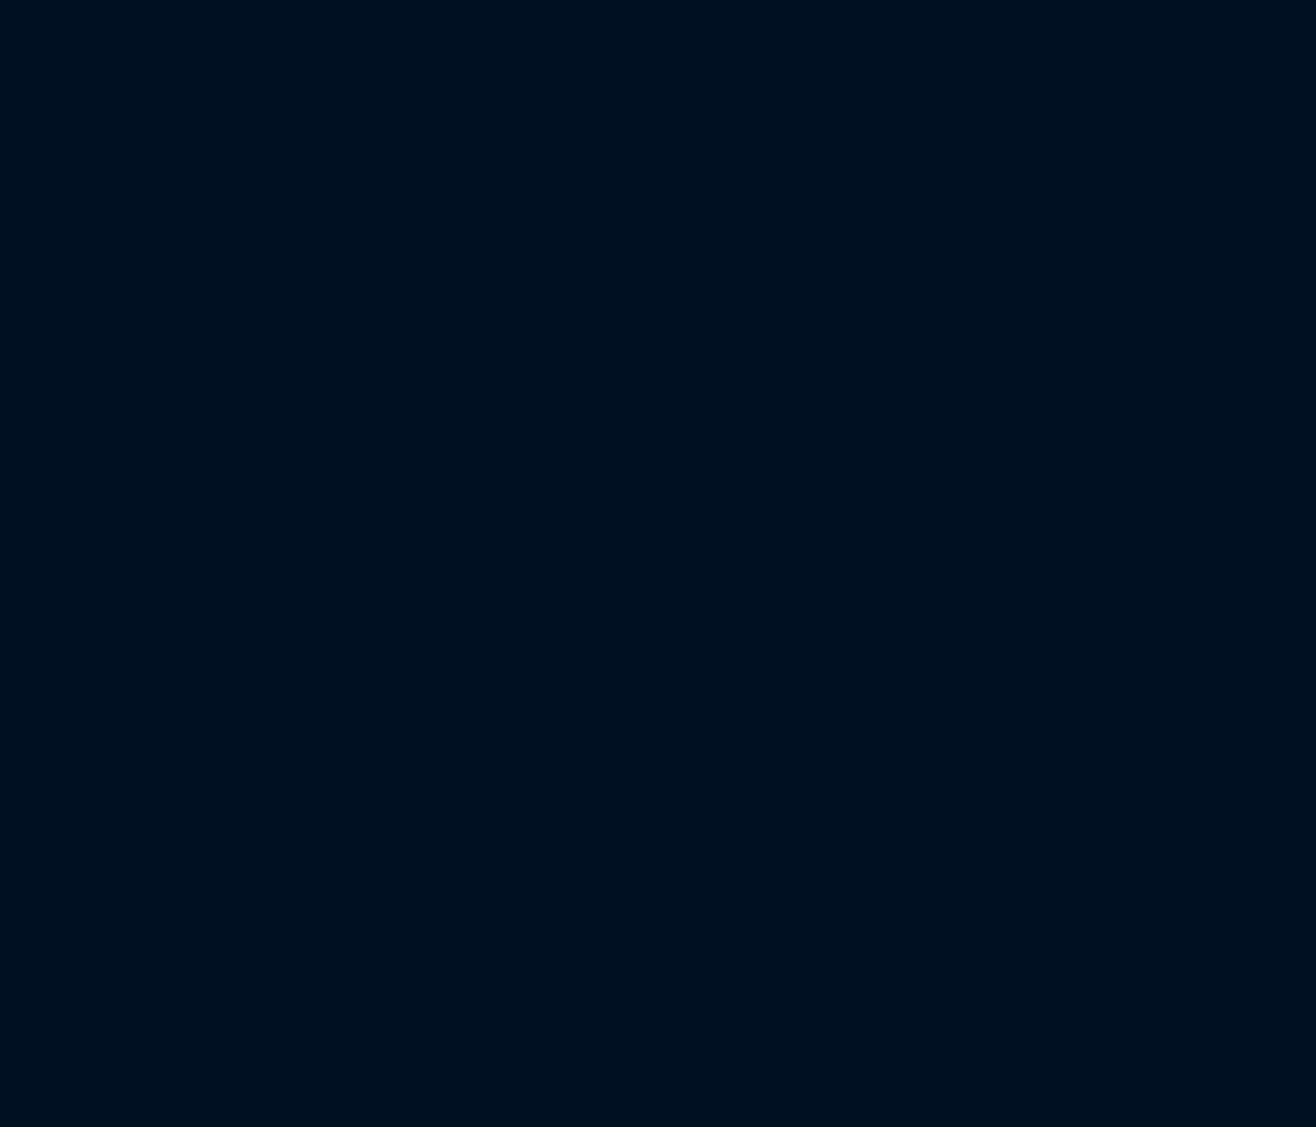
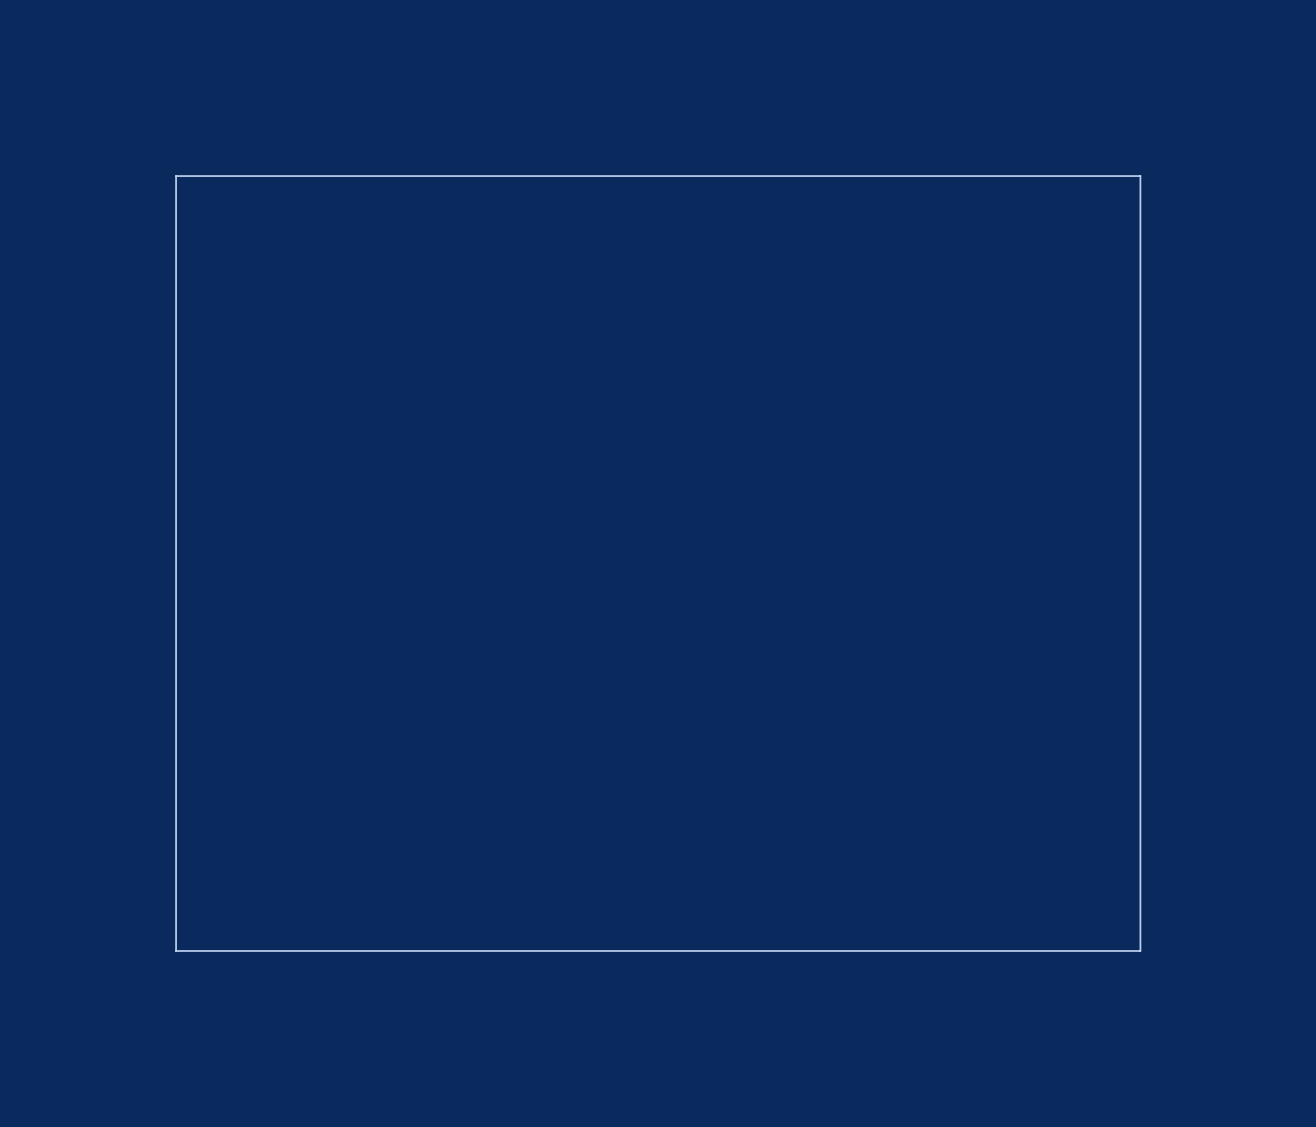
board edge: none -> (1140, 176) (176, 176) (176, 950) (1140, 950) (1140, 176)

